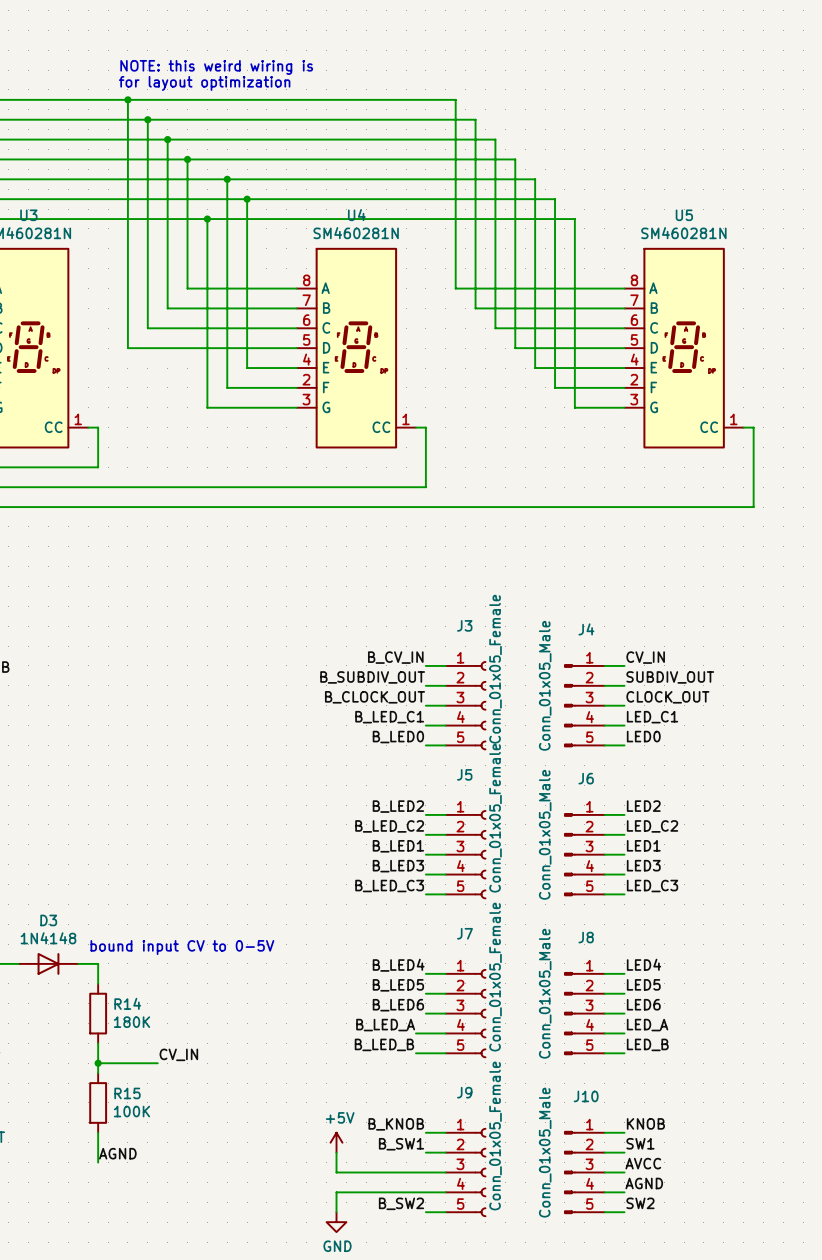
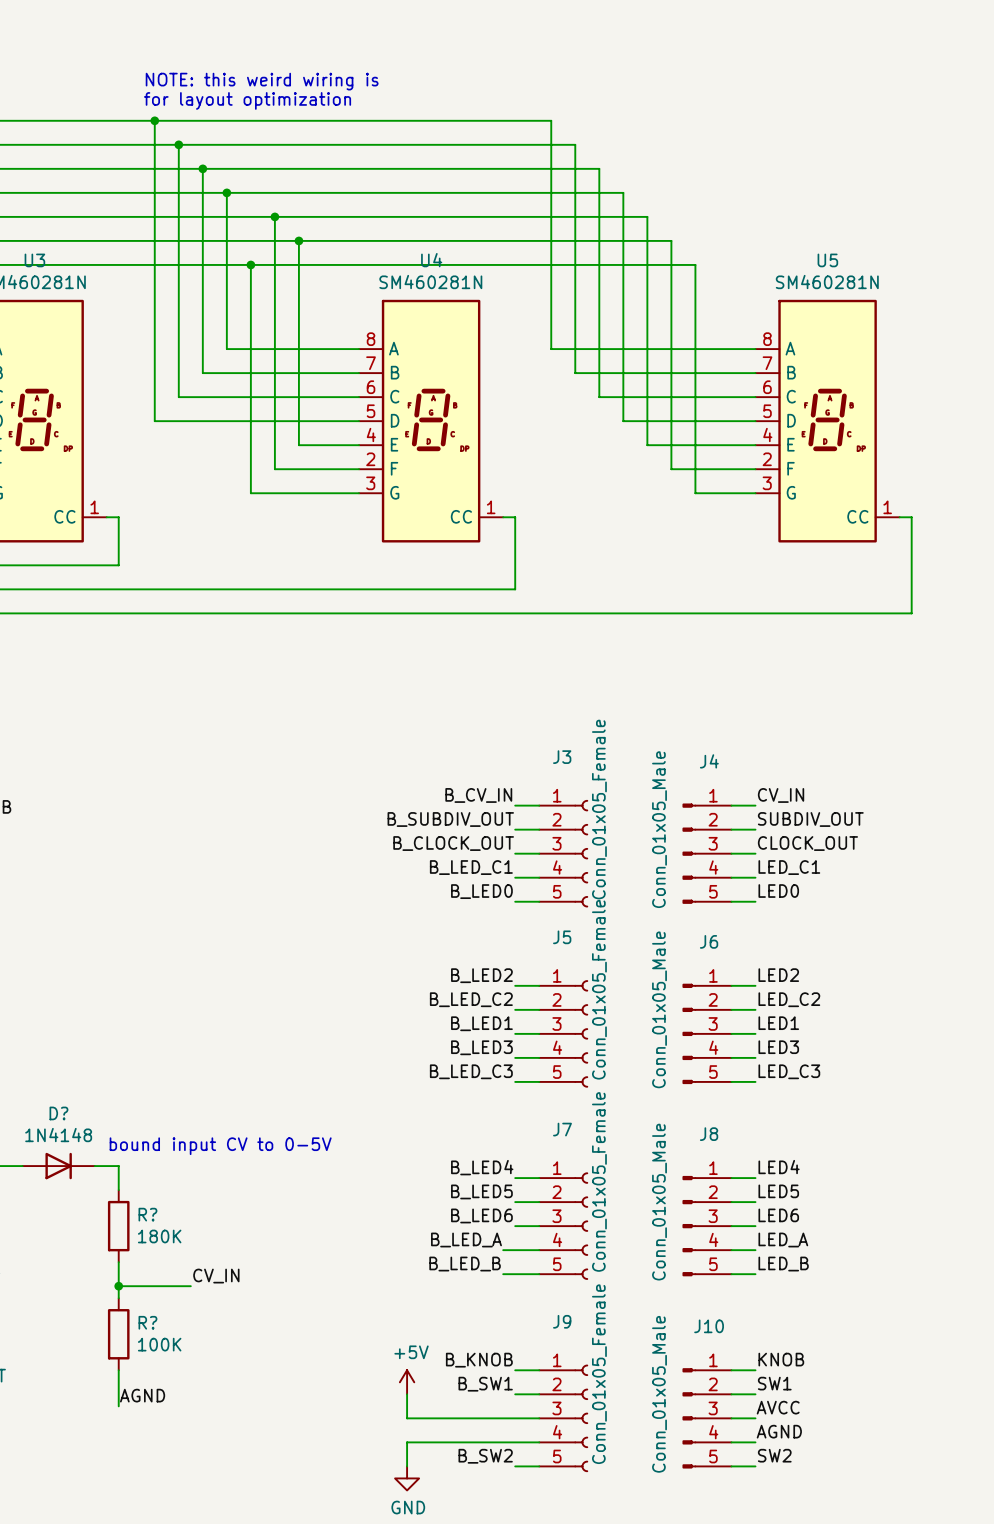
D3 name: D3 (48, 920) -> D? (58, 1113)
R14 name: R14 (127, 1003) -> R? (147, 1214)
R15 name: R15 (127, 1093) -> R? (147, 1322)

